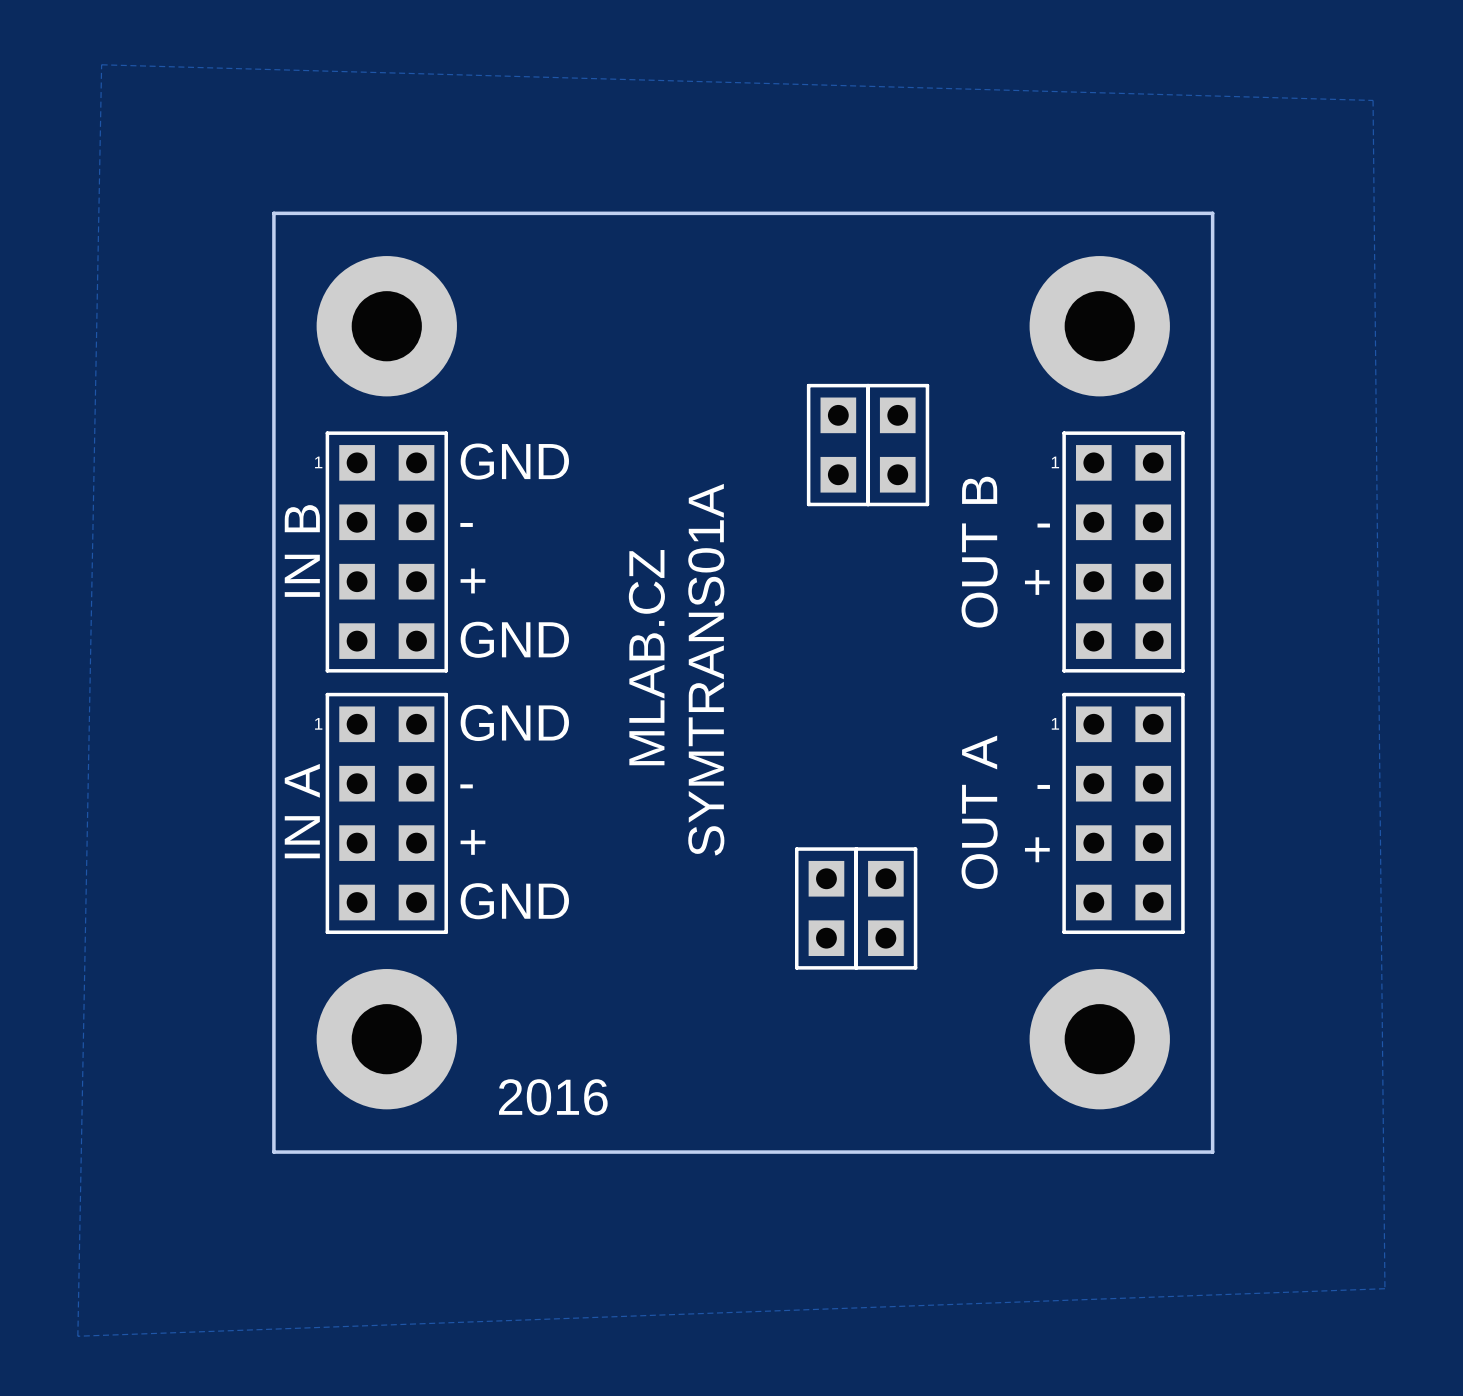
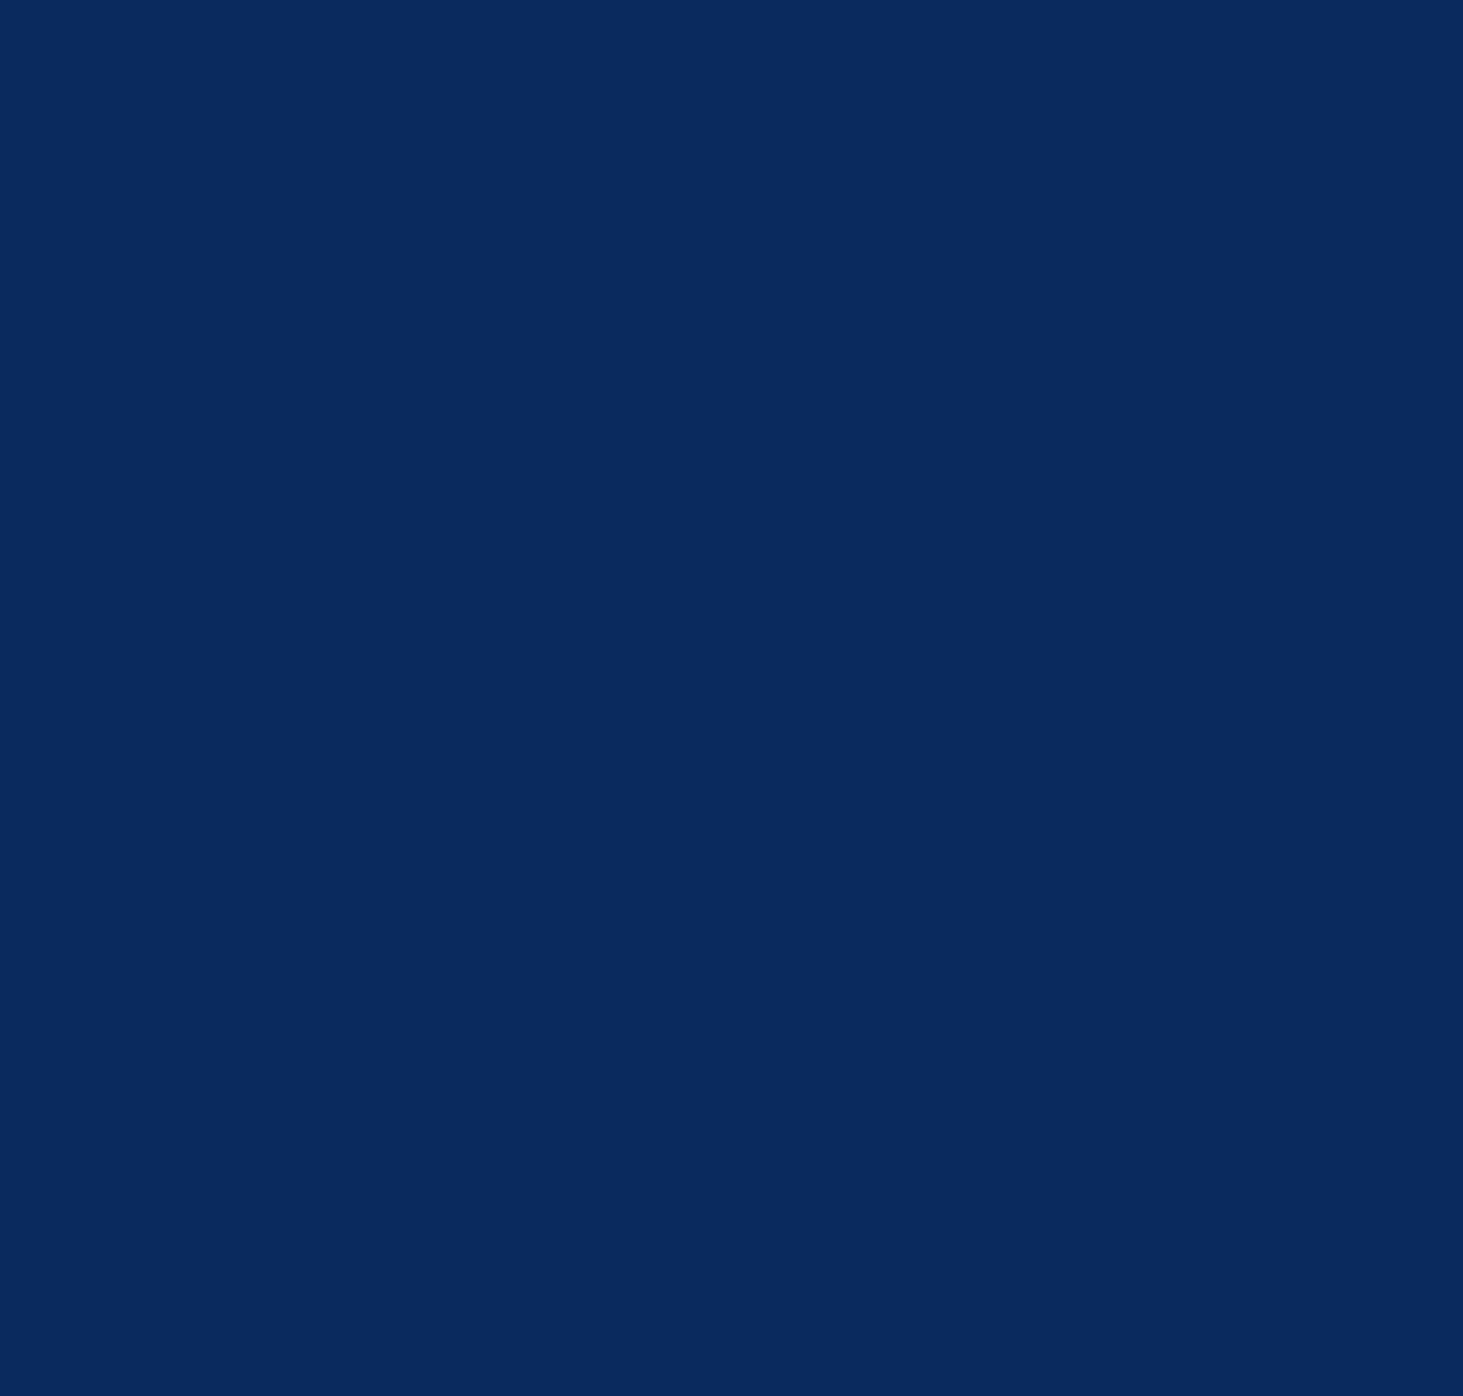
zone outline: (101, 64) (77, 1336) (1384, 1288) (1373, 100) (101, 64) -> none
board edge: (273, 213) (273, 1152) (1212, 1152) (1212, 213) (273, 213) -> none
part: (386, 326) -> none
part: (1099, 326) -> none
part: (838, 445) -> none
part: (897, 445) -> none
text: GND (514, 461) -> none
text: - (466, 524) -> none
text: - (1043, 525) -> none
text: IN B (302, 550) -> none
part: (386, 551) -> none
part: (1123, 551) -> none
text: OUT B (979, 552) -> none
text: + (472, 580) -> none
text: + (1037, 582) -> none
text: GND (514, 639) -> none
text: MLAB.CZ (646, 657) -> none
text: SYMTRANS01A (706, 669) -> none
text: GND (514, 722) -> none
text: - (466, 786) -> none
text: - (1043, 786) -> none
text: IN A (302, 811) -> none
text: OUT A (979, 812) -> none
part: (386, 813) -> none
part: (1123, 813) -> none
text: + (472, 842) -> none
text: + (1037, 849) -> none
text: GND (514, 901) -> none
part: (826, 908) -> none
part: (885, 908) -> none
part: (386, 1039) -> none
part: (1099, 1039) -> none
text: 2016 (553, 1097) -> none

